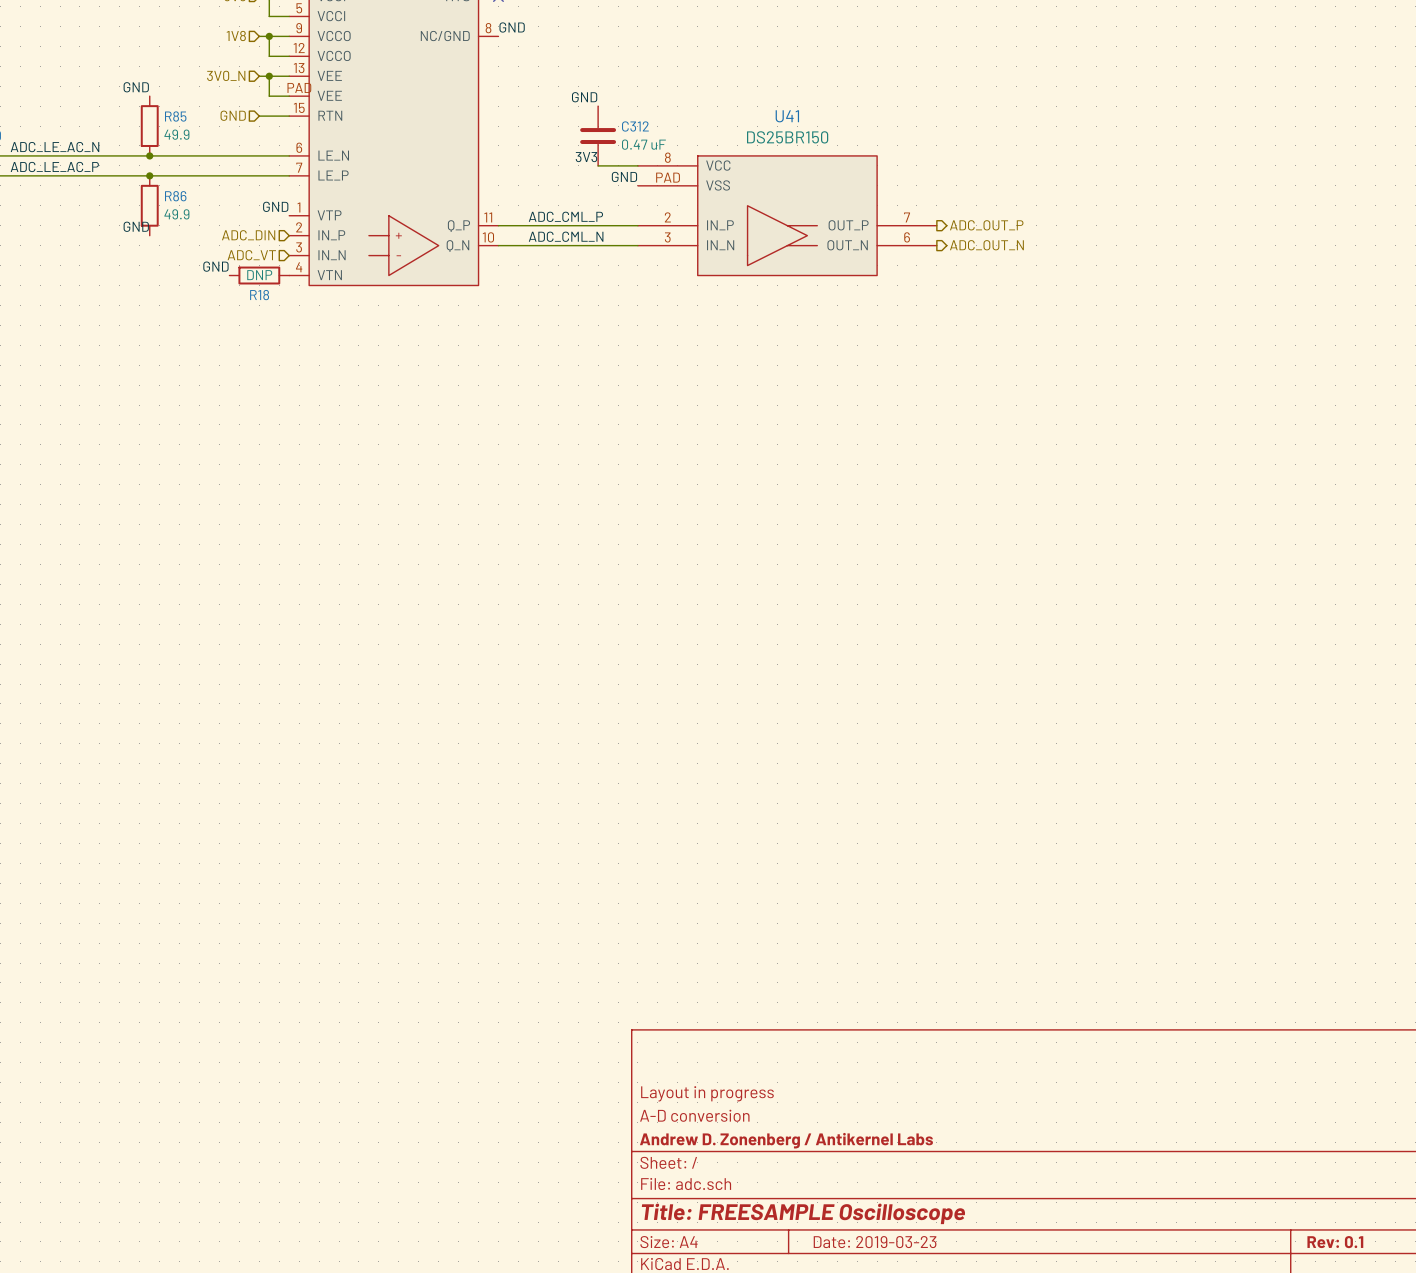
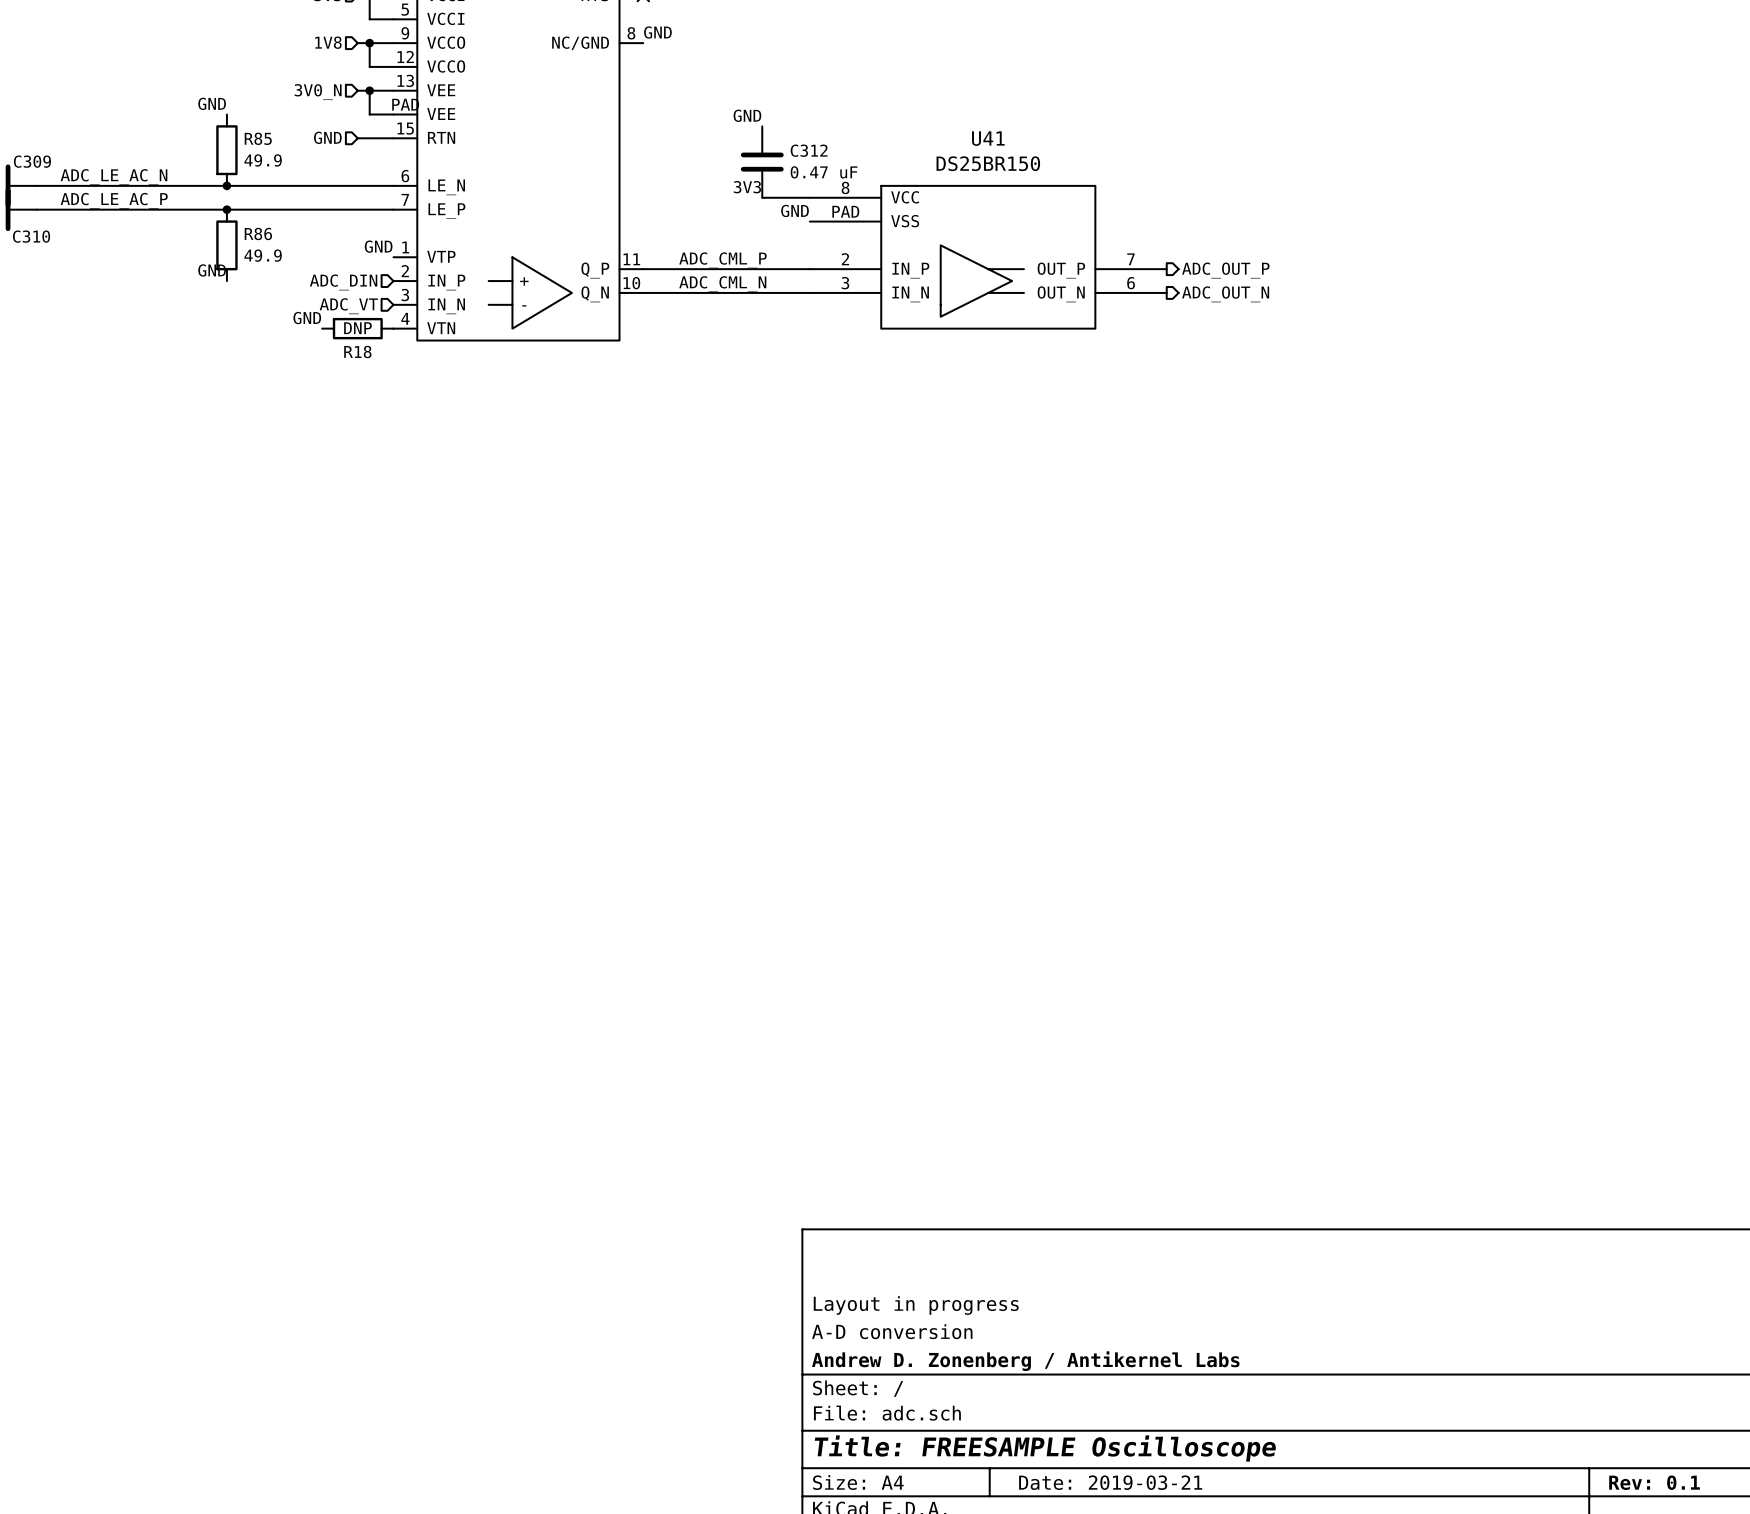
title block: Date: 2019-03-23 (875, 1242) -> Date: 2019-03-21 (1110, 1482)

